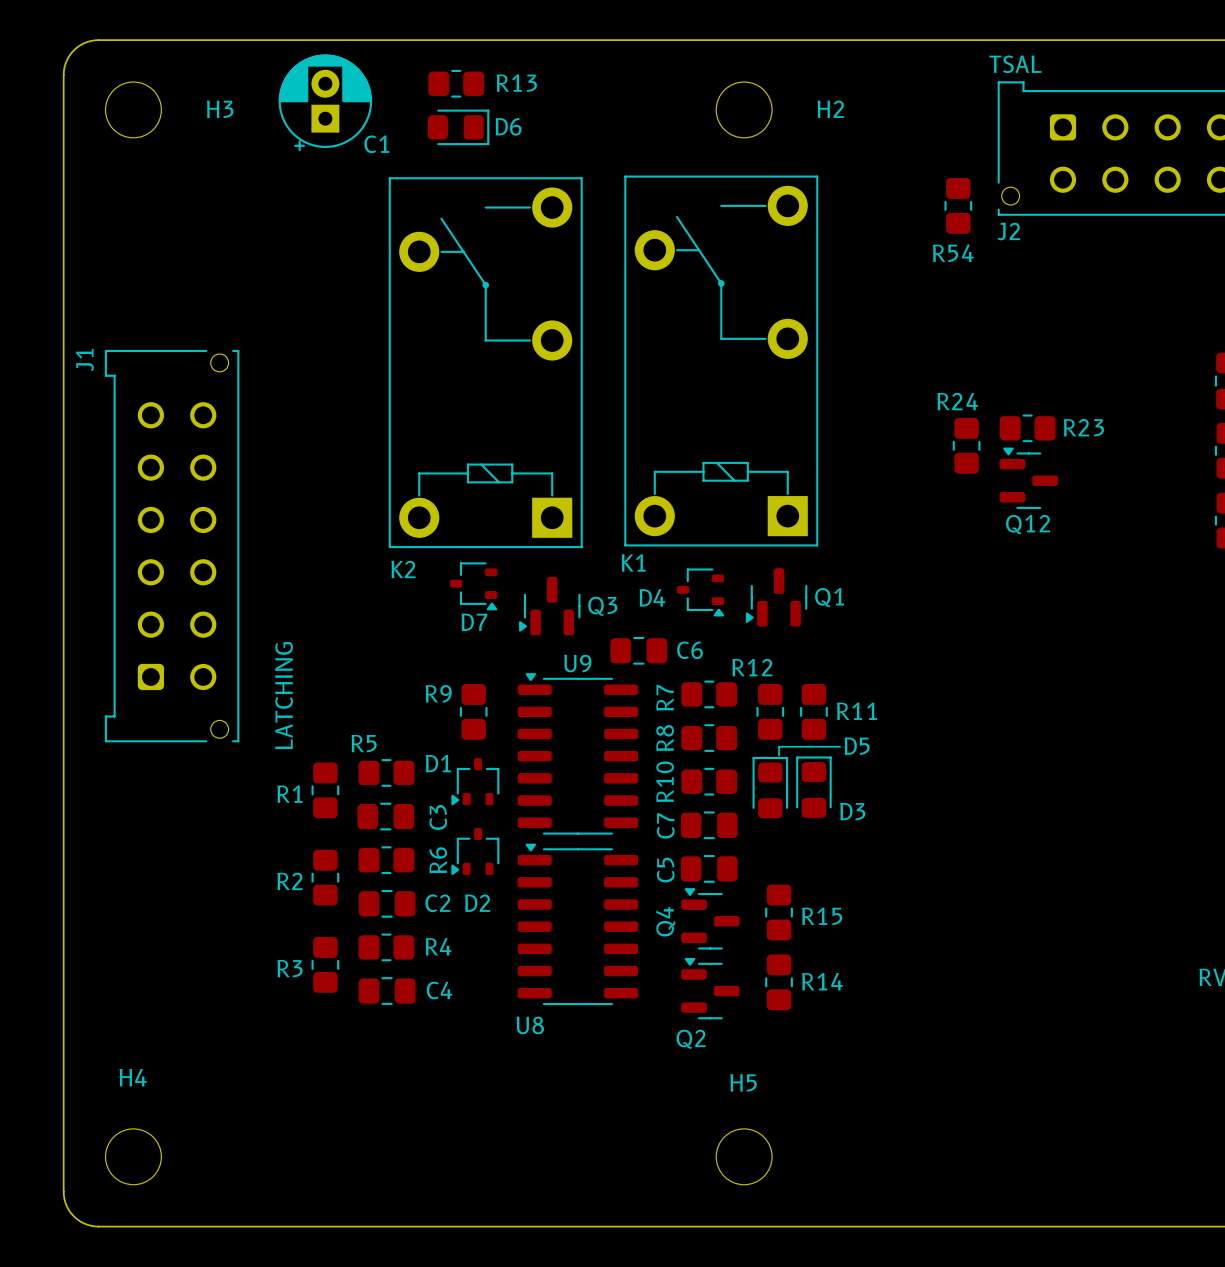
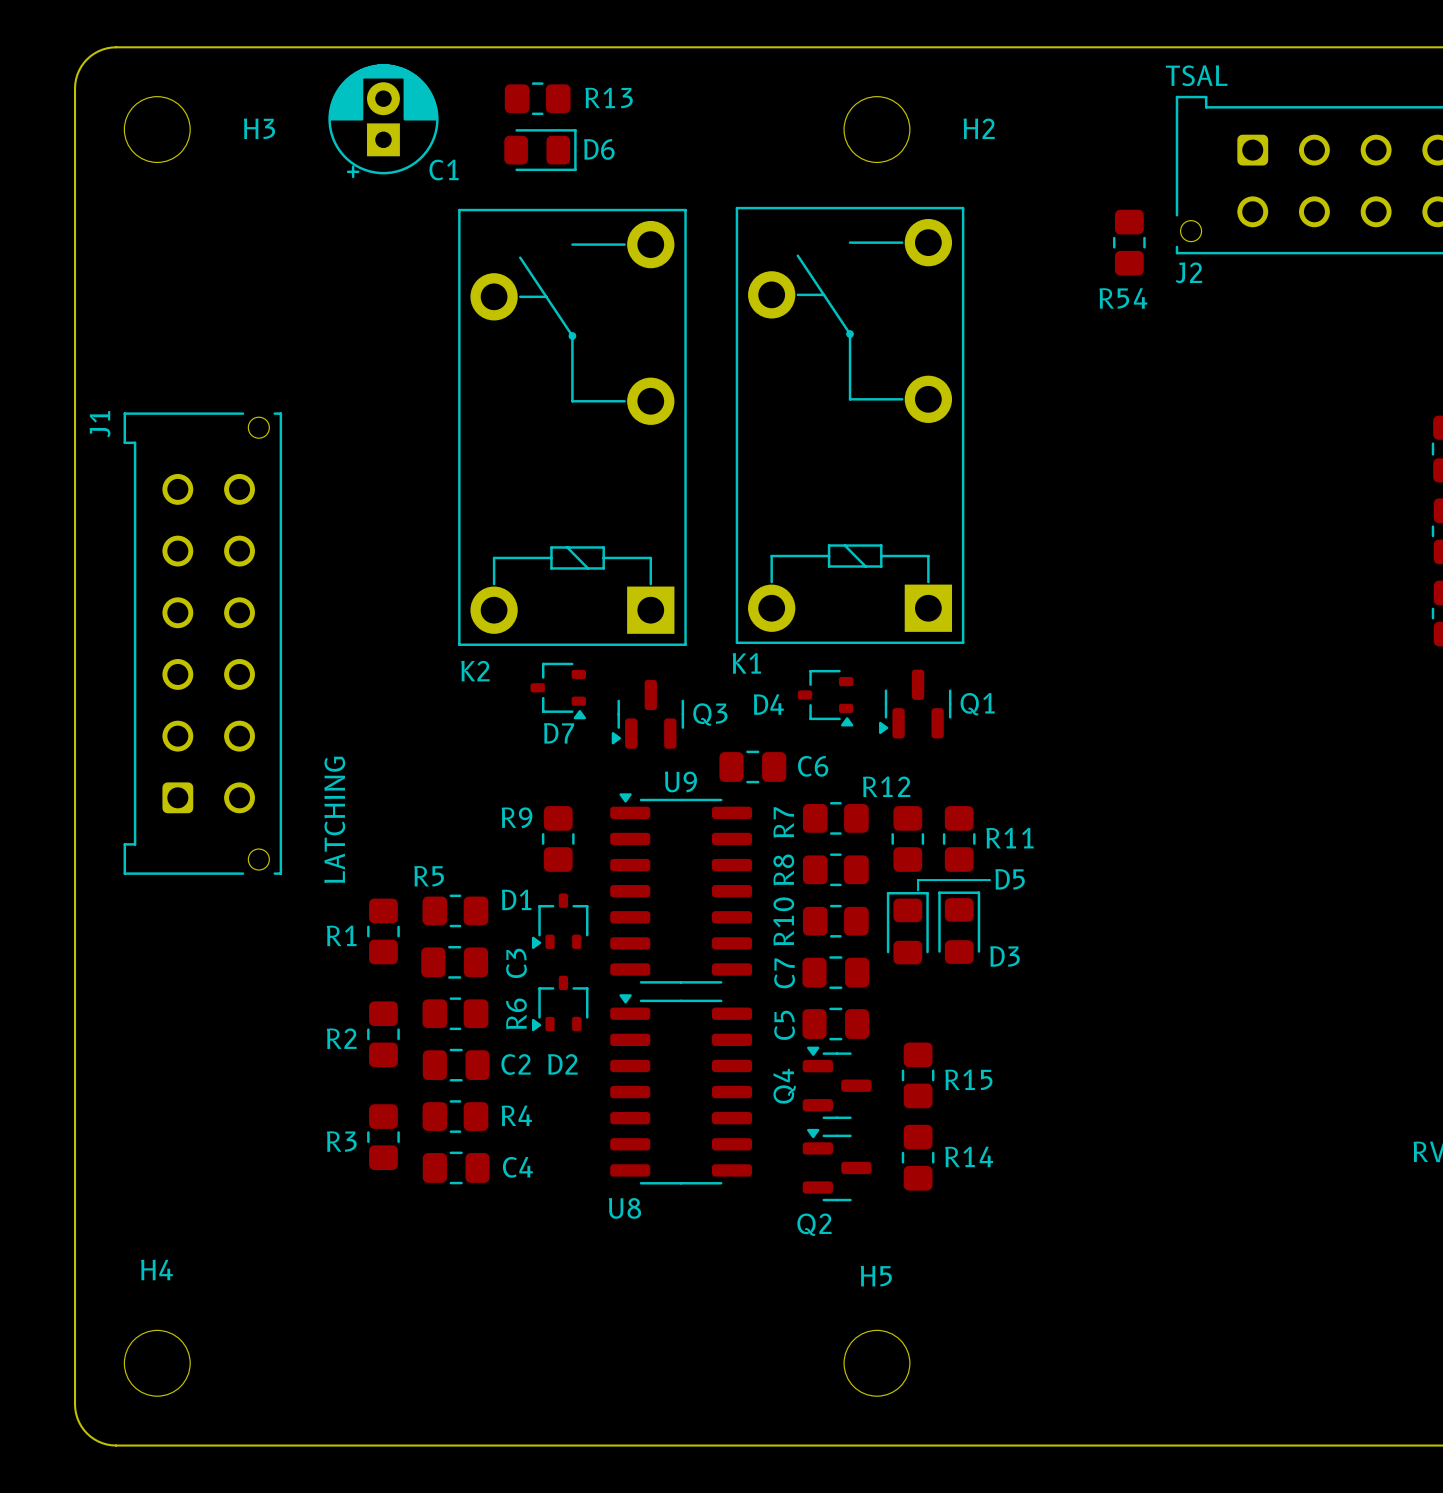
R23: (1027, 428) -> none
R24: (966, 445) -> none
Q12: (1028, 478) -> none

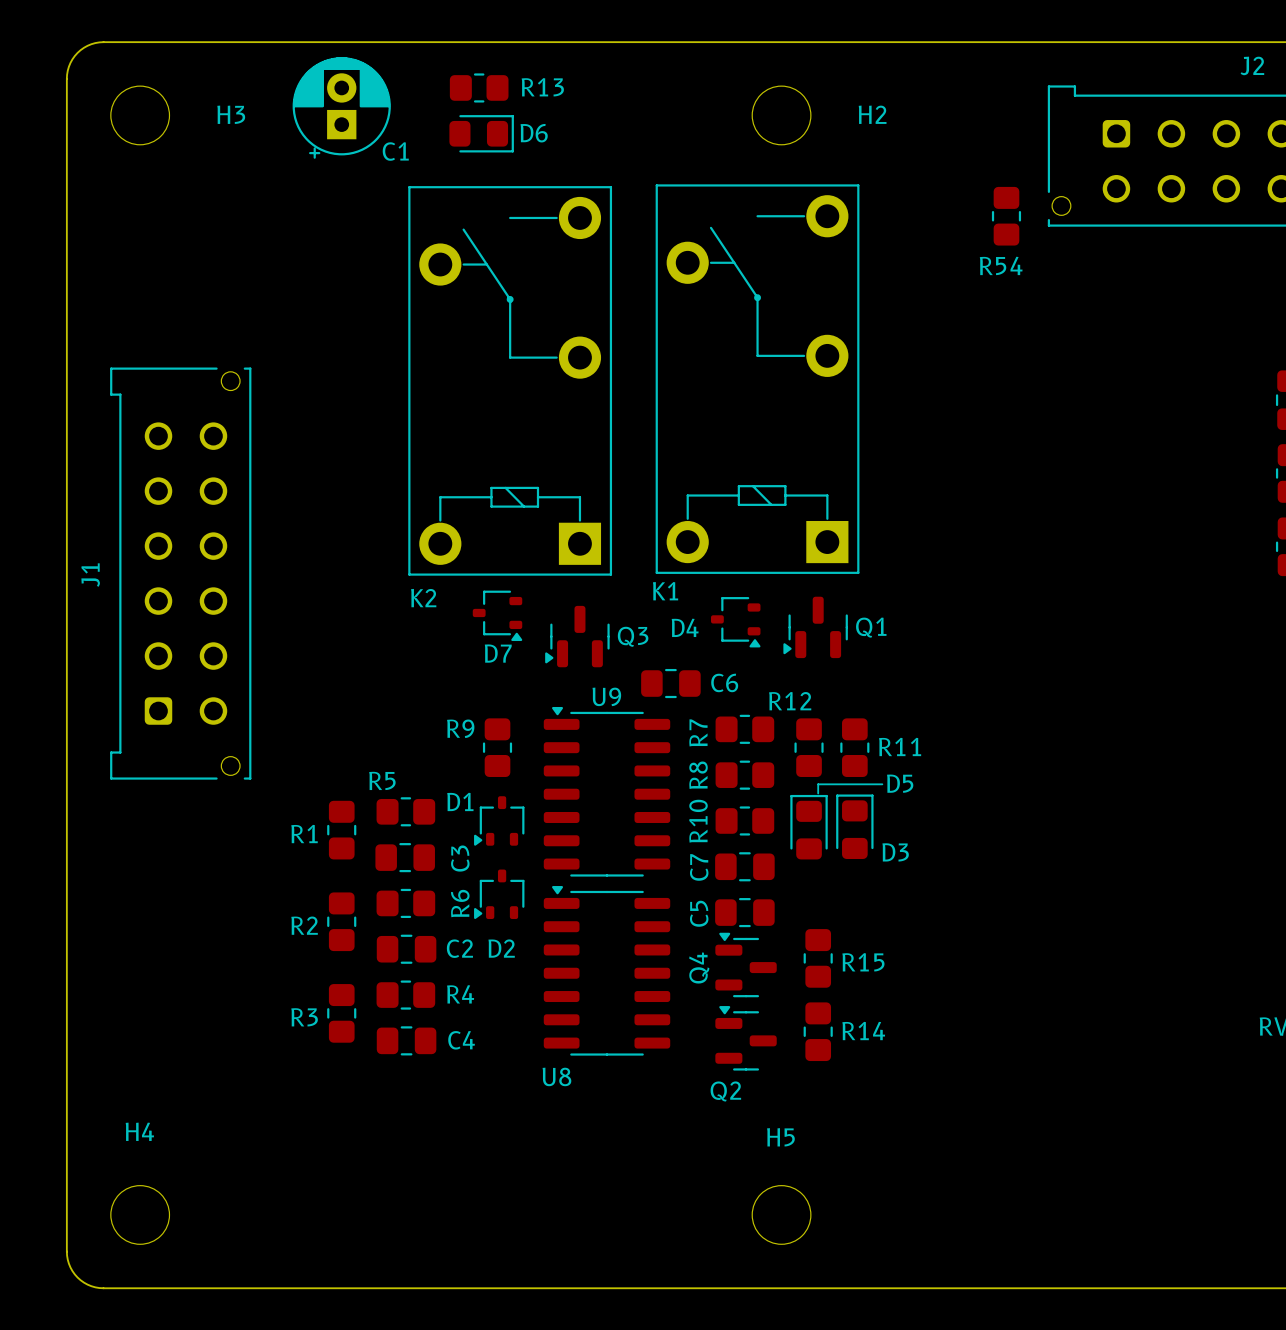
text: TSAL (1196, 75) -> none
J2 name position: J2 (1188, 272) -> J2 (1252, 65)
J1 name position: J1 (100, 424) -> J1 (90, 575)
text: LATCHING (334, 819) -> none

